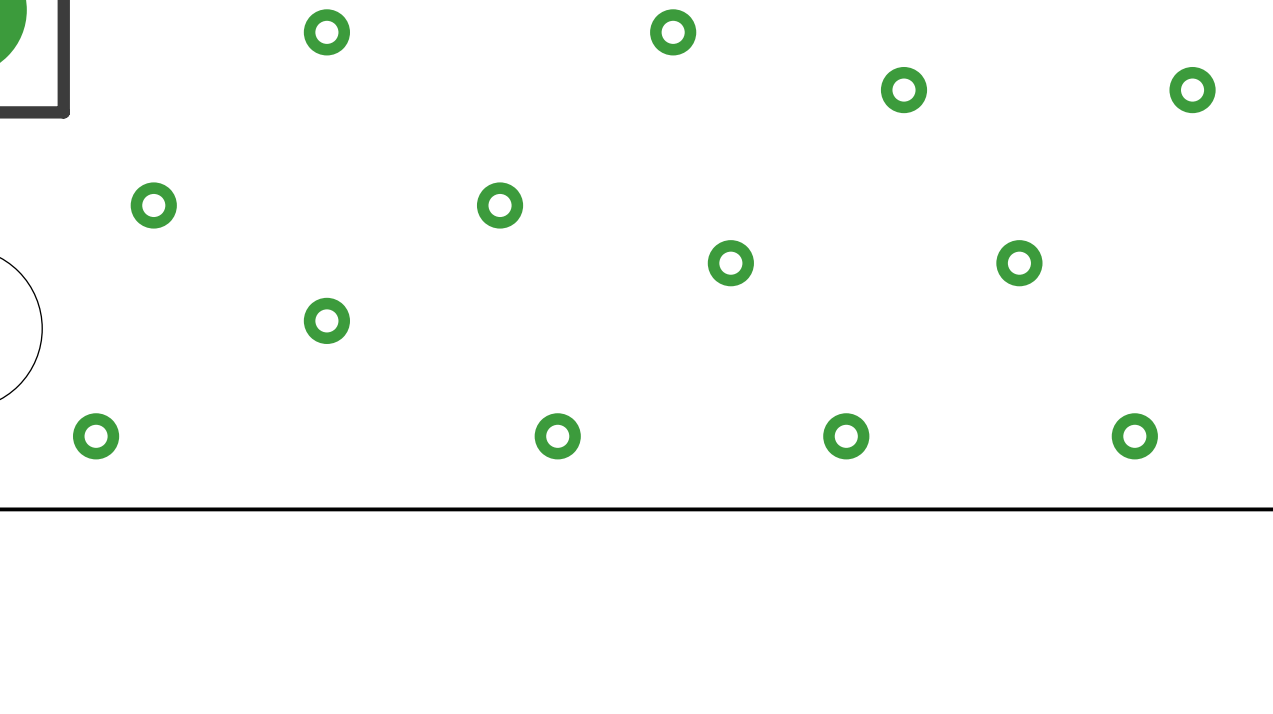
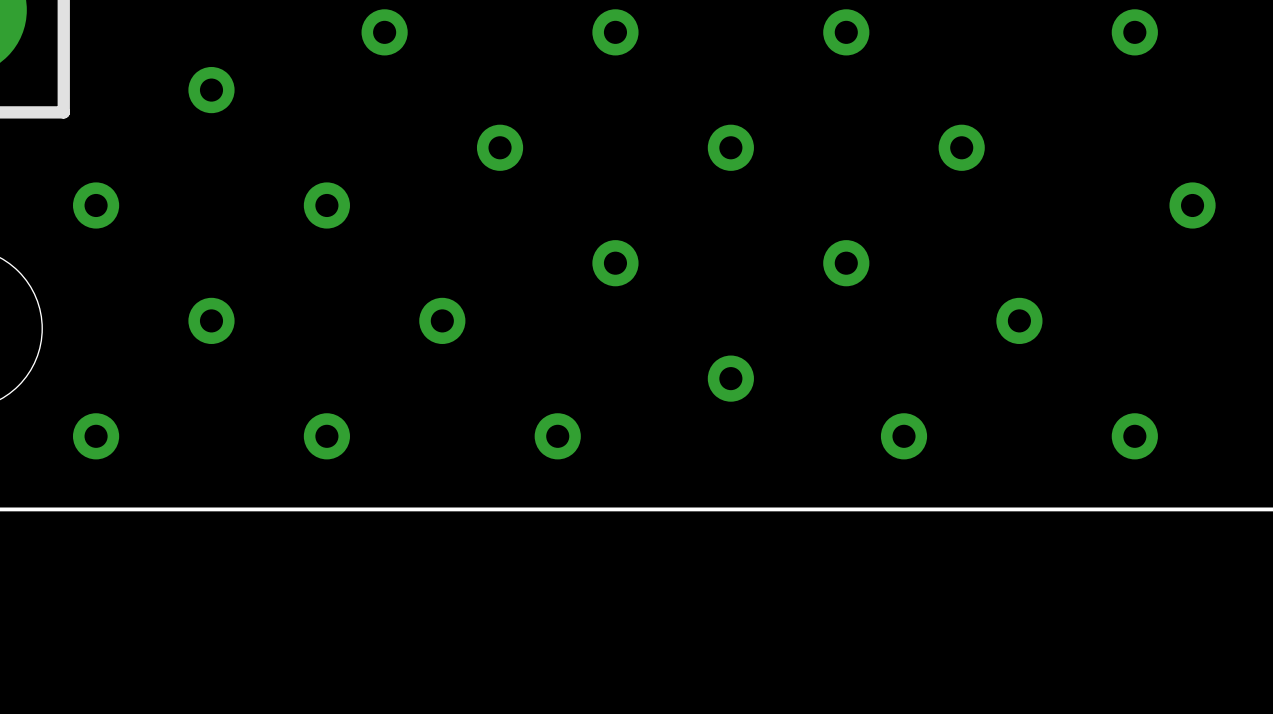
via position: (326, 32) -> (384, 32)
via position: (673, 32) -> (615, 32)
via: none -> (846, 32)
via: none -> (1134, 32)
via: none -> (211, 90)
via: (904, 90) -> none
via: (1192, 90) -> none
via: none -> (730, 147)
via: none -> (961, 147)
via position: (153, 205) -> (96, 205)
via: none -> (326, 205)
via position: (500, 205) -> (500, 147)
via: none -> (1192, 205)
via: none -> (615, 263)
via: (730, 263) -> none
via: none -> (846, 263)
via position: (1019, 263) -> (1019, 320)
via: none -> (211, 320)
via: (326, 320) -> none
via: none -> (442, 320)
via: none -> (730, 378)
via: none -> (326, 436)
via position: (846, 436) -> (904, 436)

